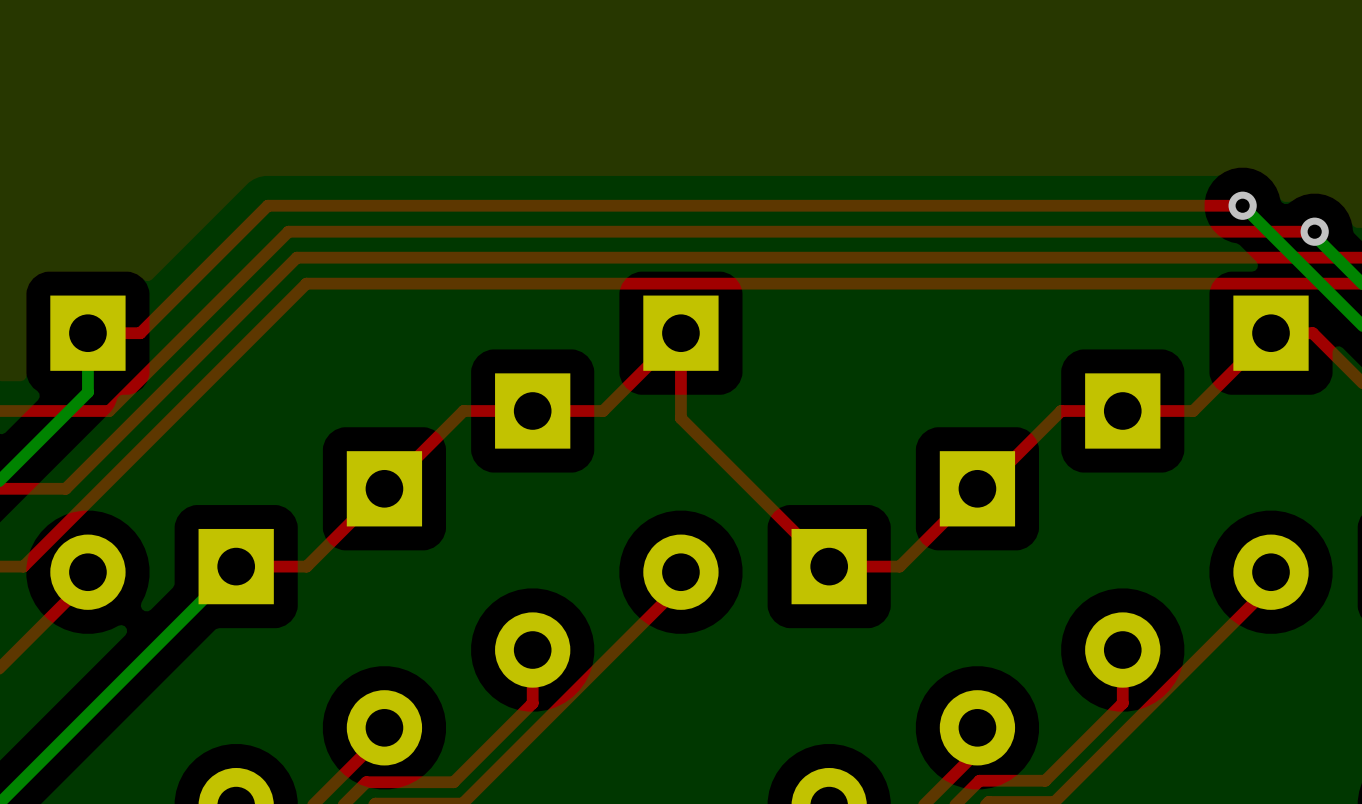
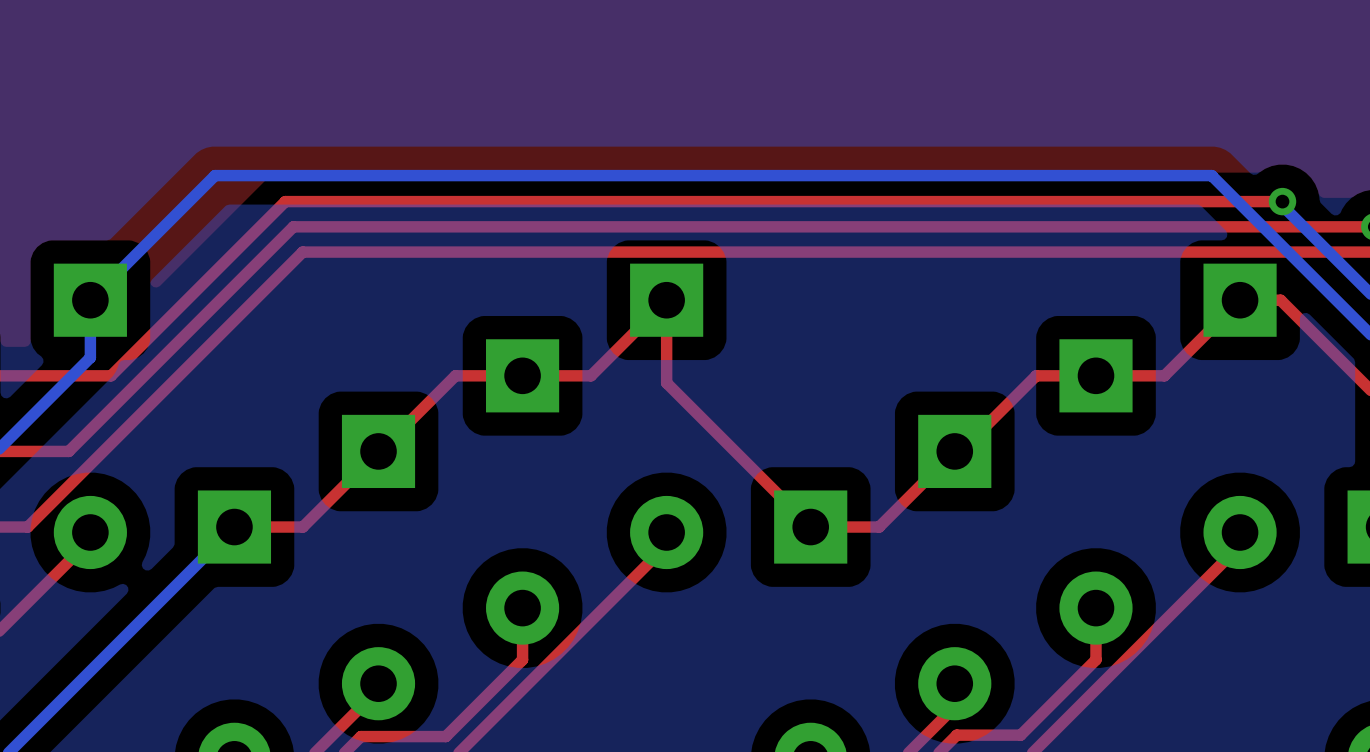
top track: (1242, 205) (267, 205) (140, 333) (87, 333) -> none
bottom track: none -> (1212, 176) (215, 175) (90, 300)
via: (1242, 205) -> none

